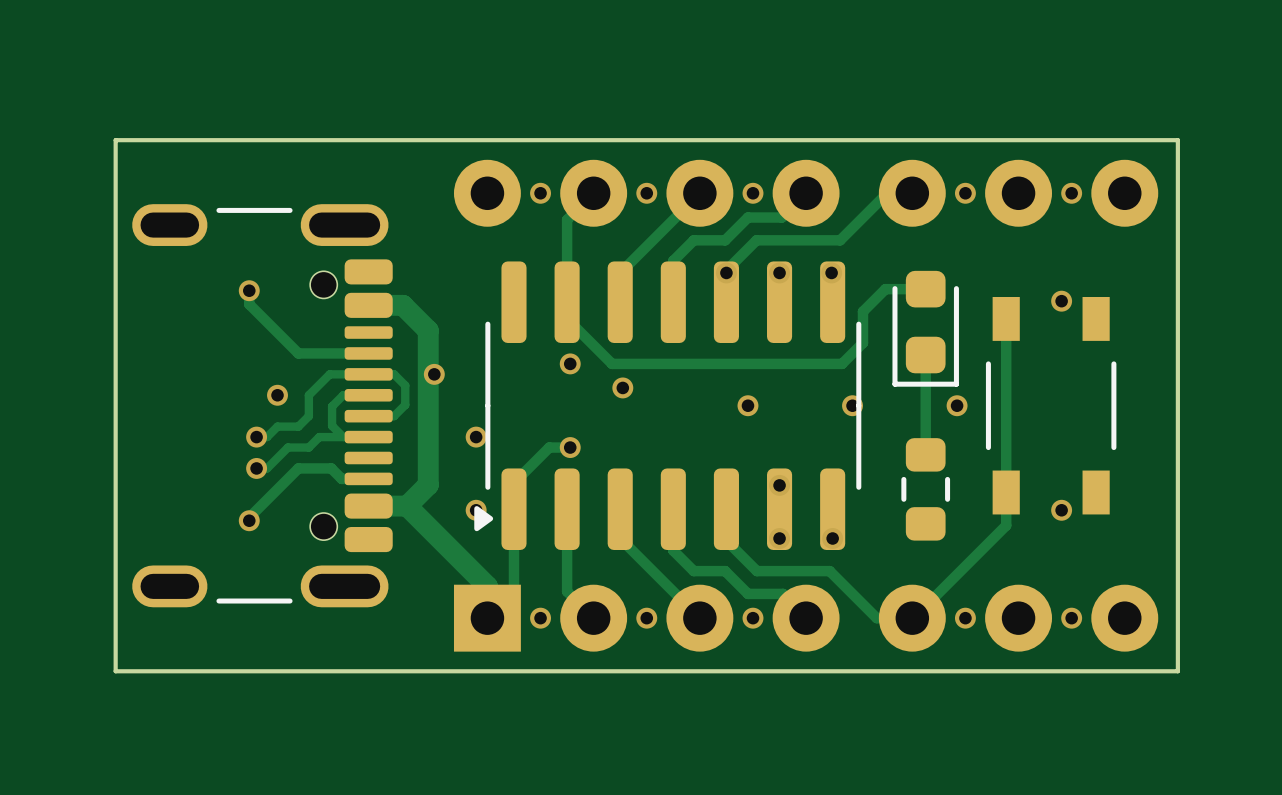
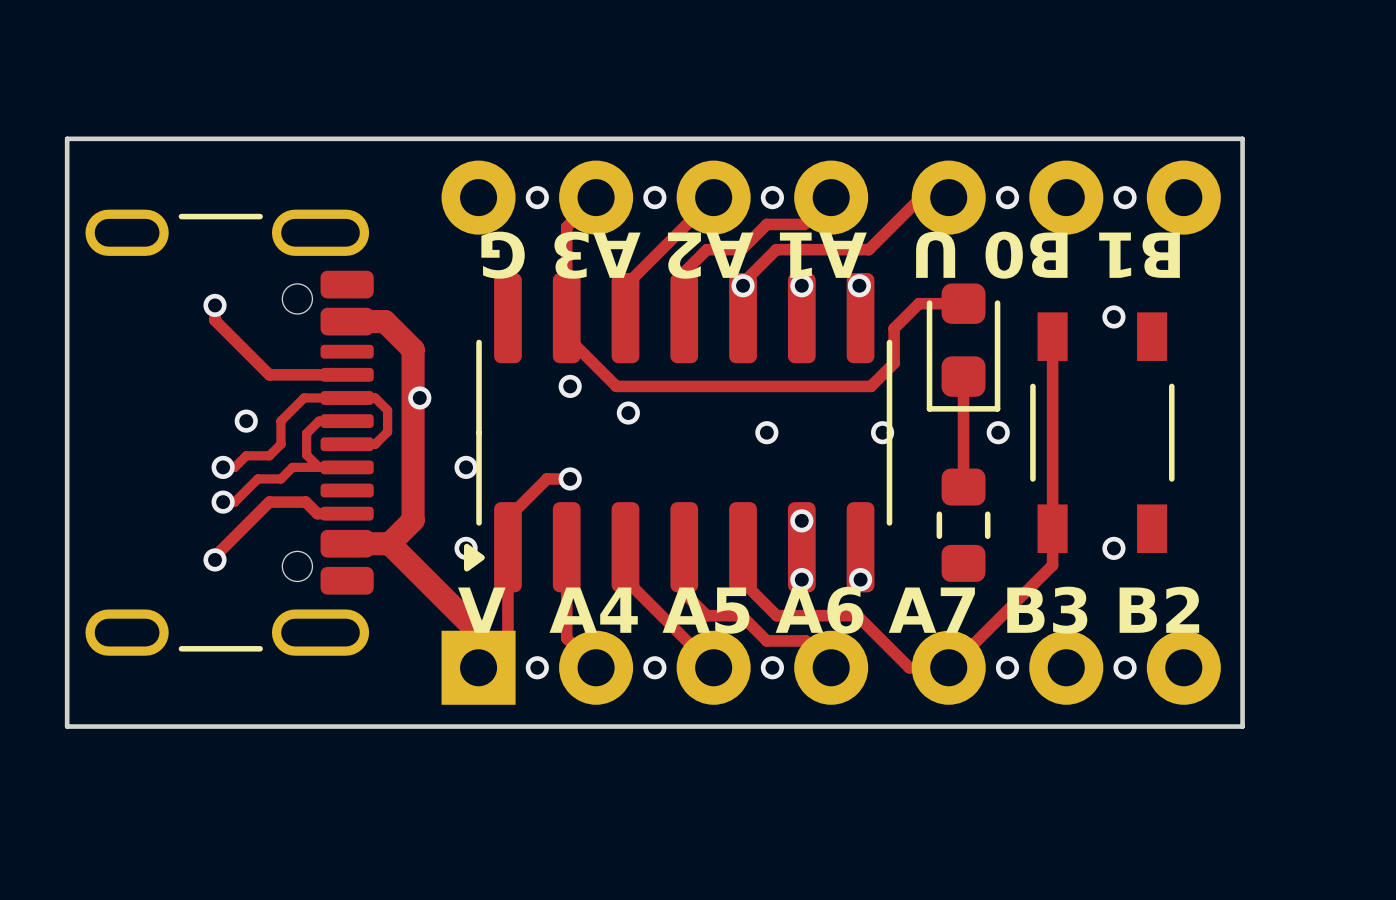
text: none -> B1 B0 U A1 A2 A3 G (830, 255)
text: none -> V A4 A5 A6 A7 B3 B2 (828, 610)

